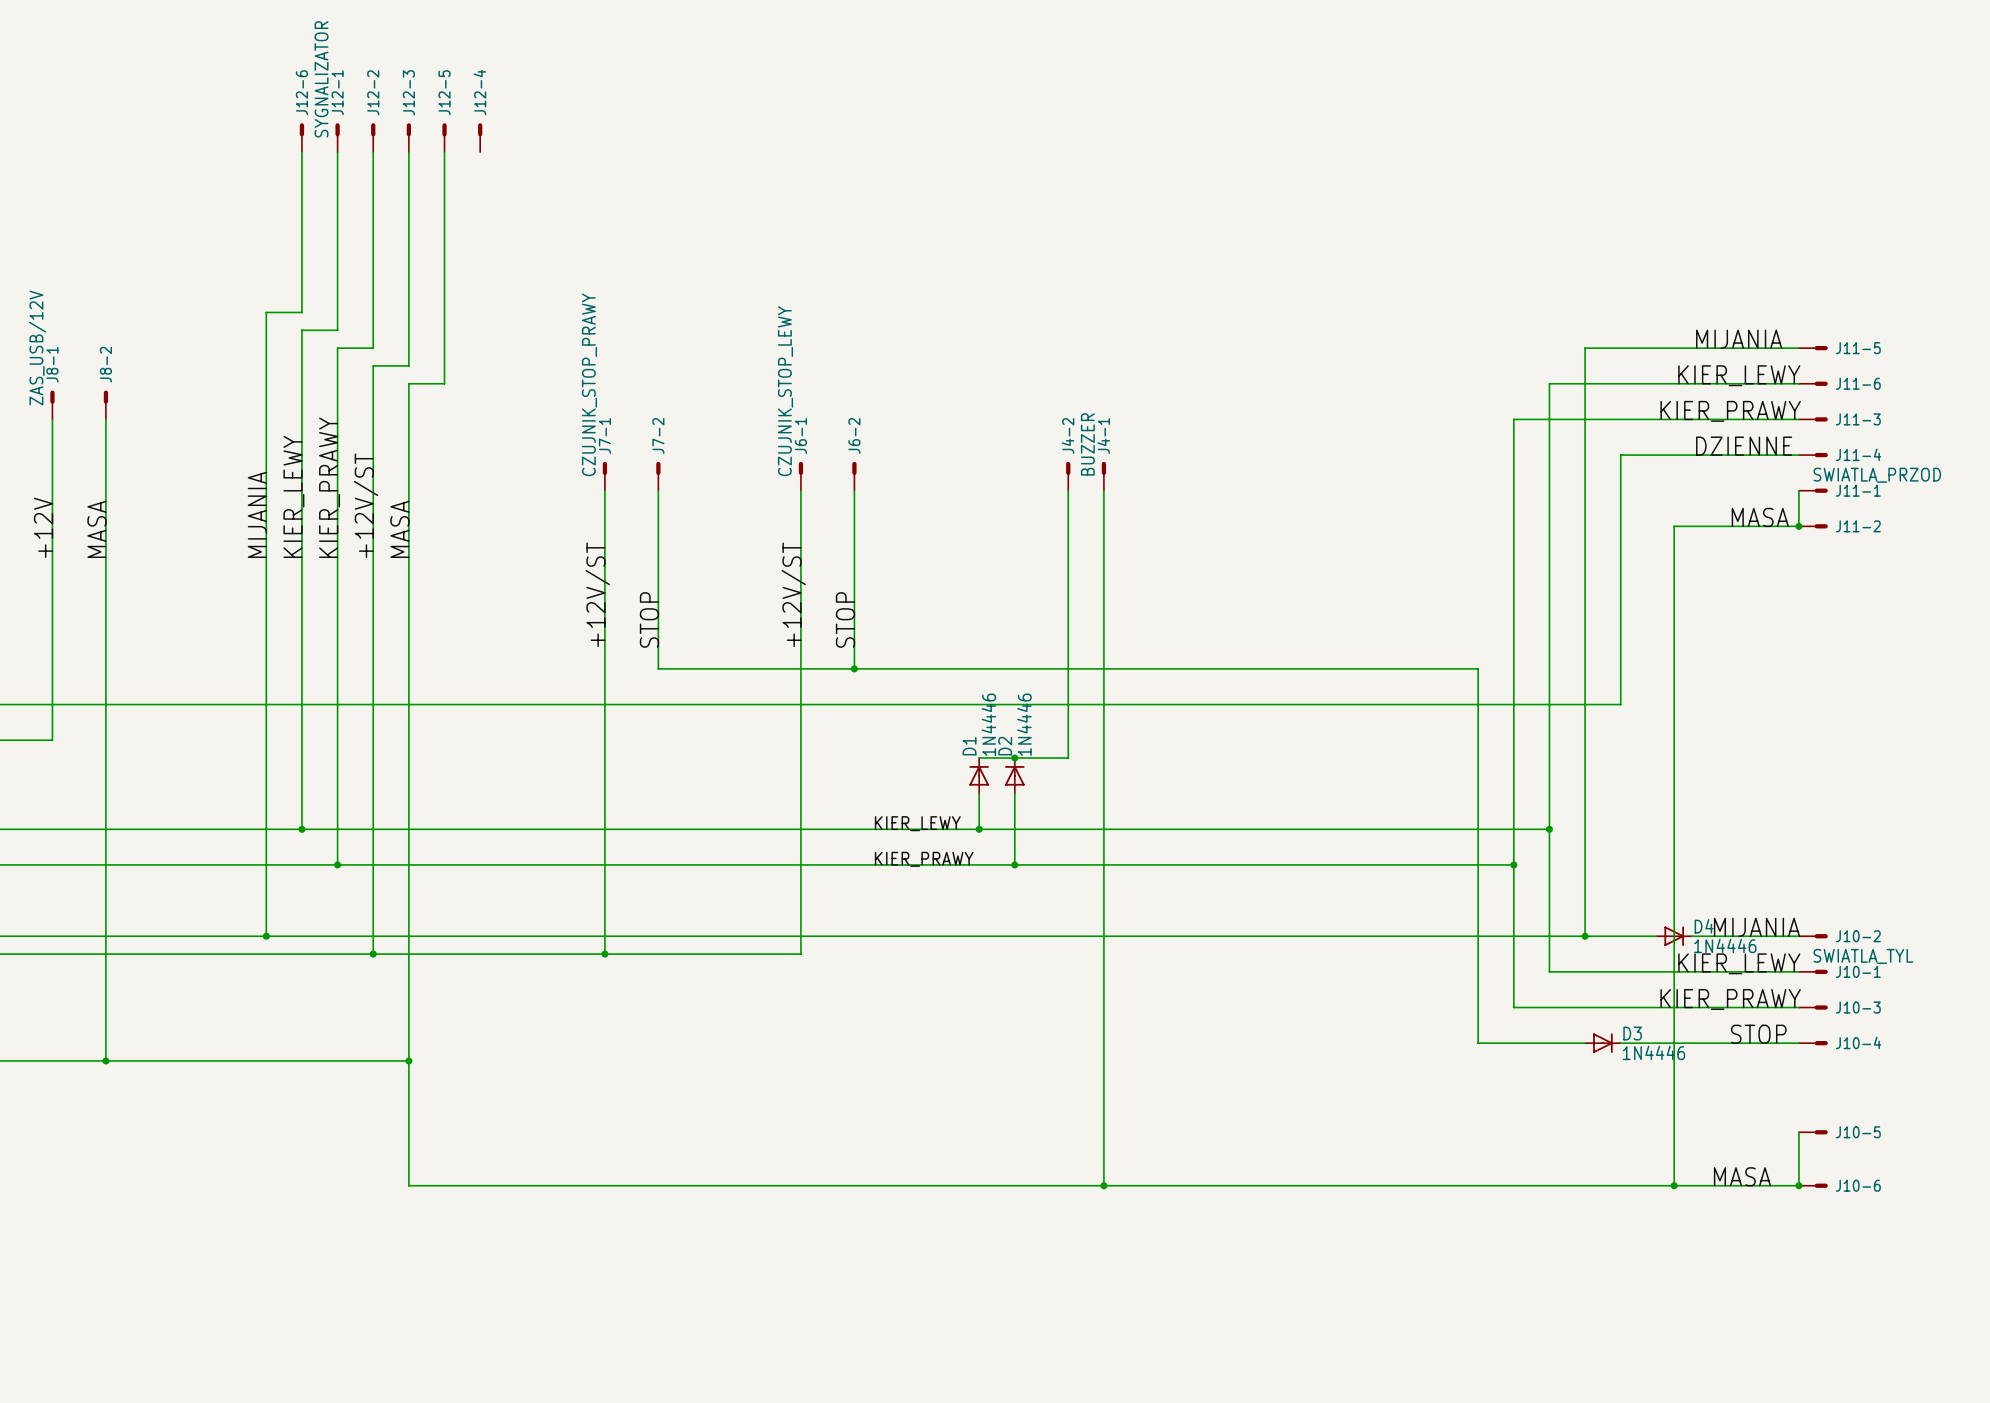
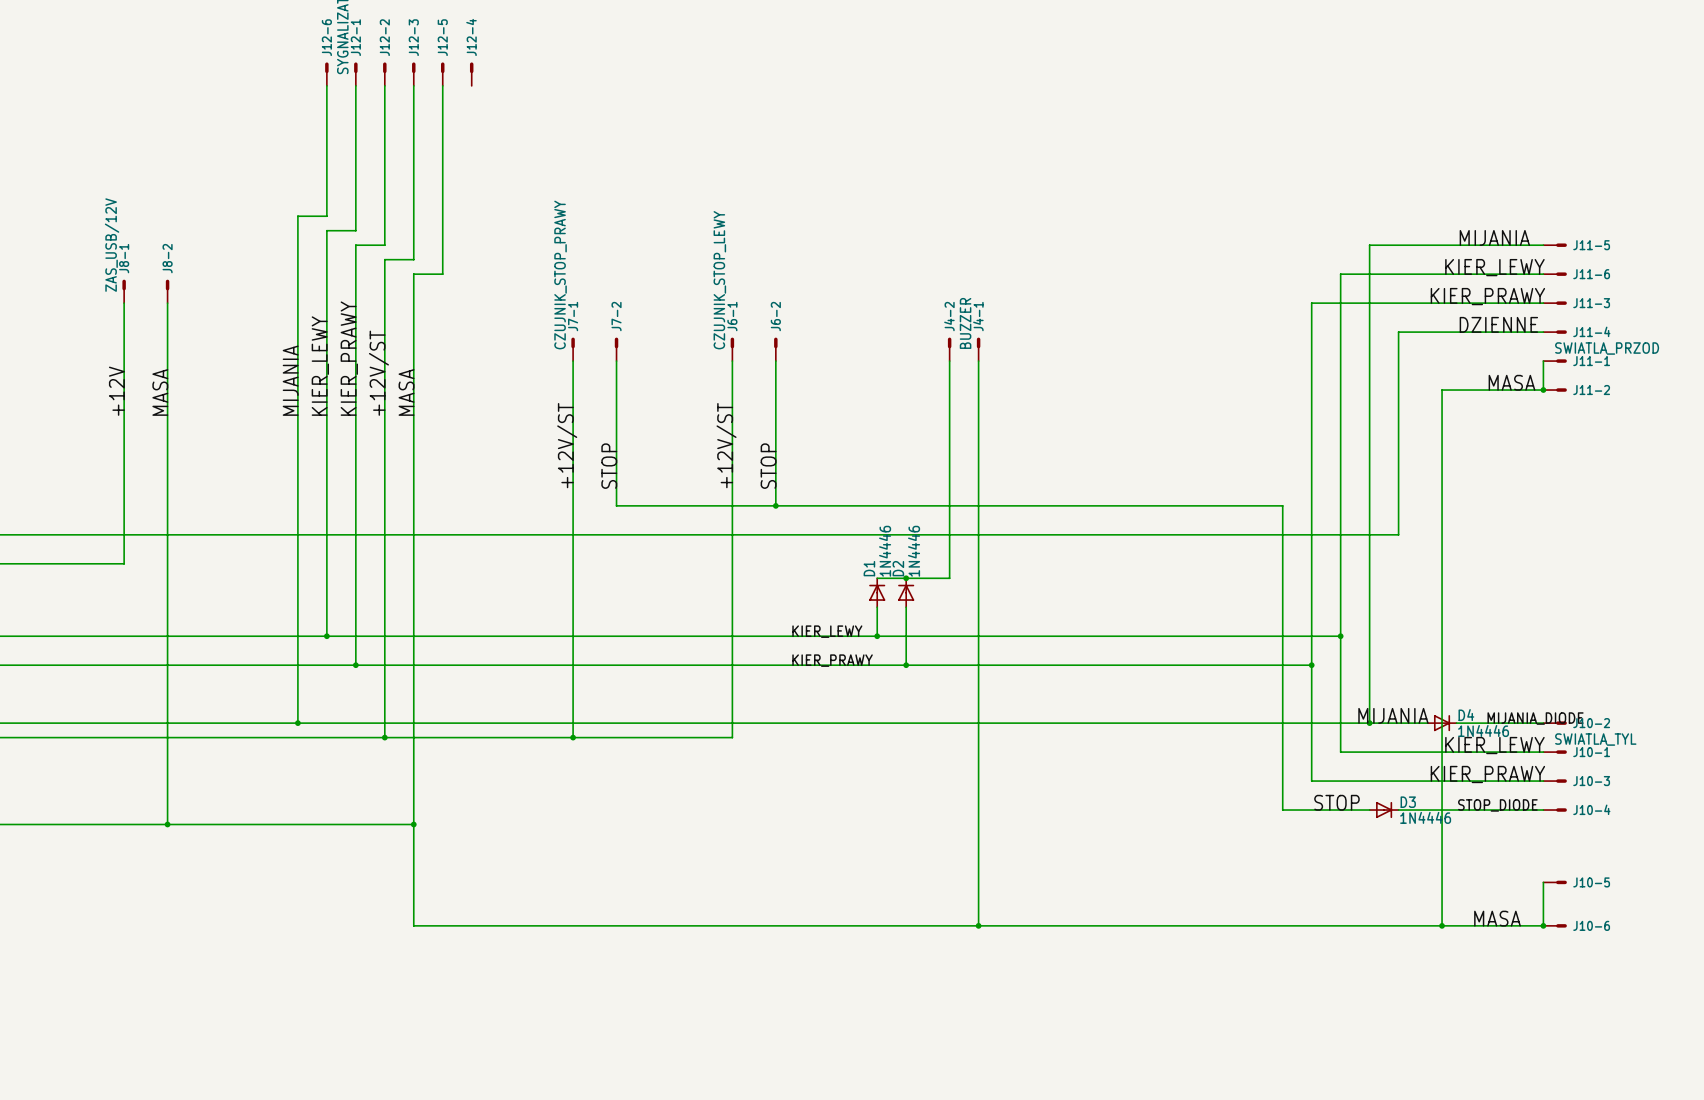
label position: MIJANIA (1756, 927) -> MIJANIA (1393, 715)
label: none -> MIJANIA_DIODE (1535, 718)
label: none -> STOP (1336, 802)
label: STOP (1758, 1034) -> none
label: none -> STOP_DIODE (1497, 805)

